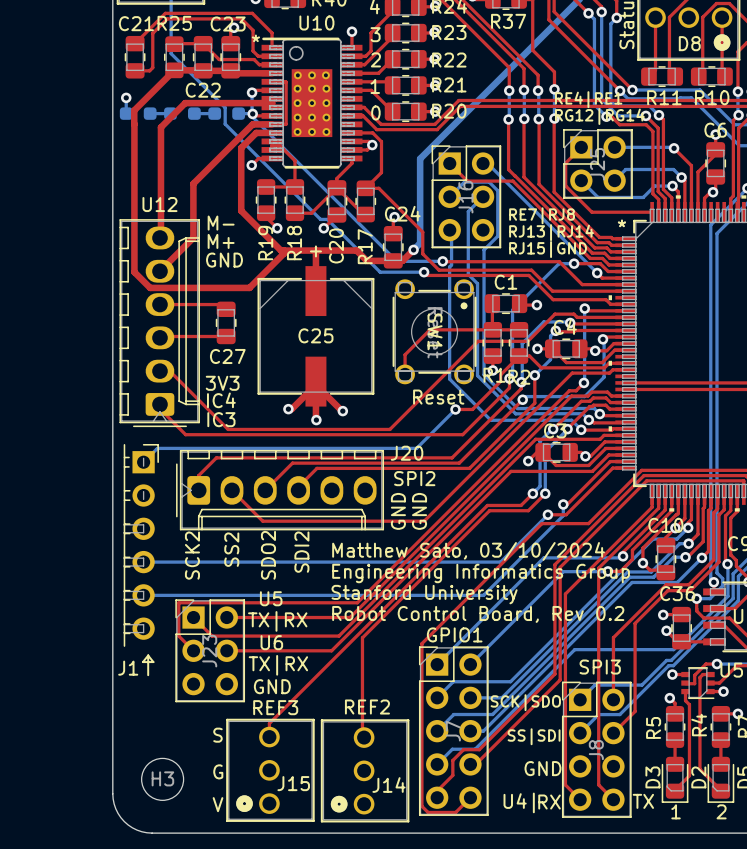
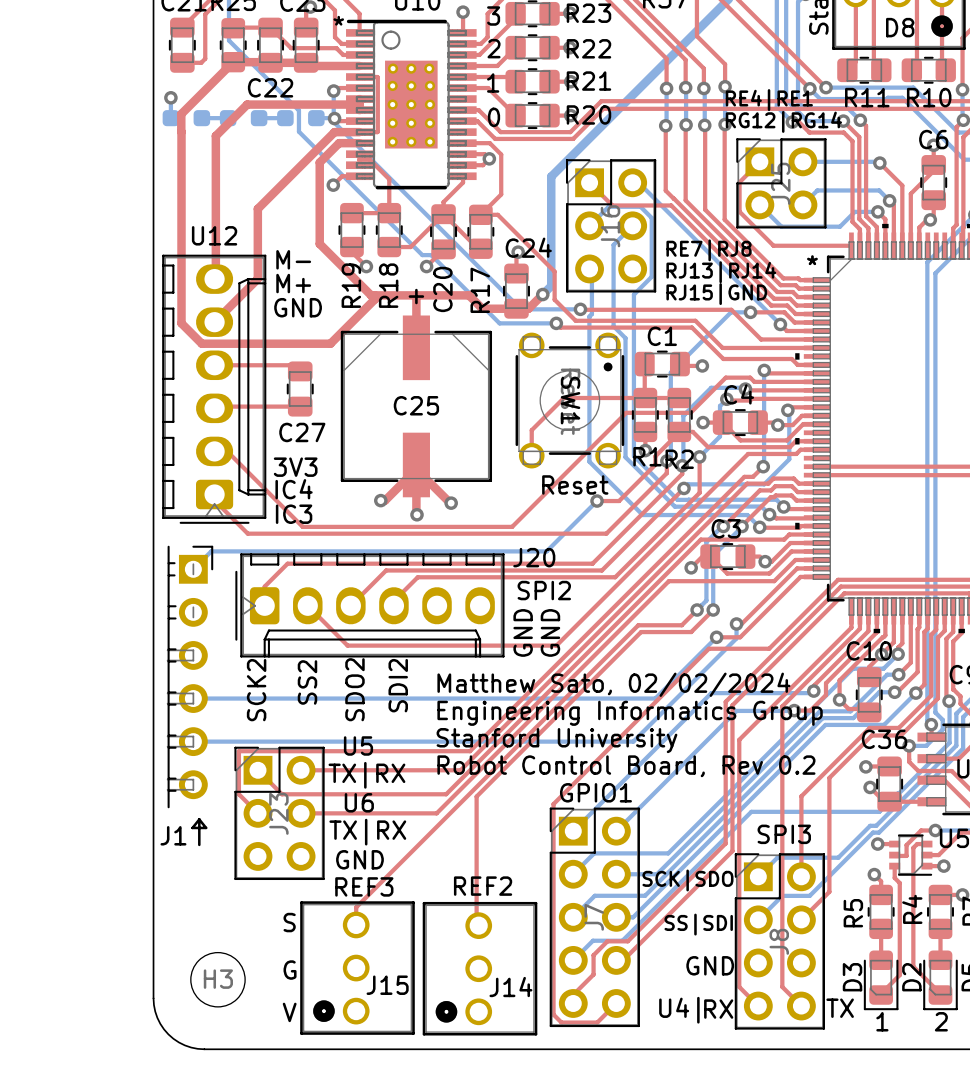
text: Matthew Sato, 03/10/2024 (468, 551) -> Matthew Sato, 02/02/2024 (613, 684)

